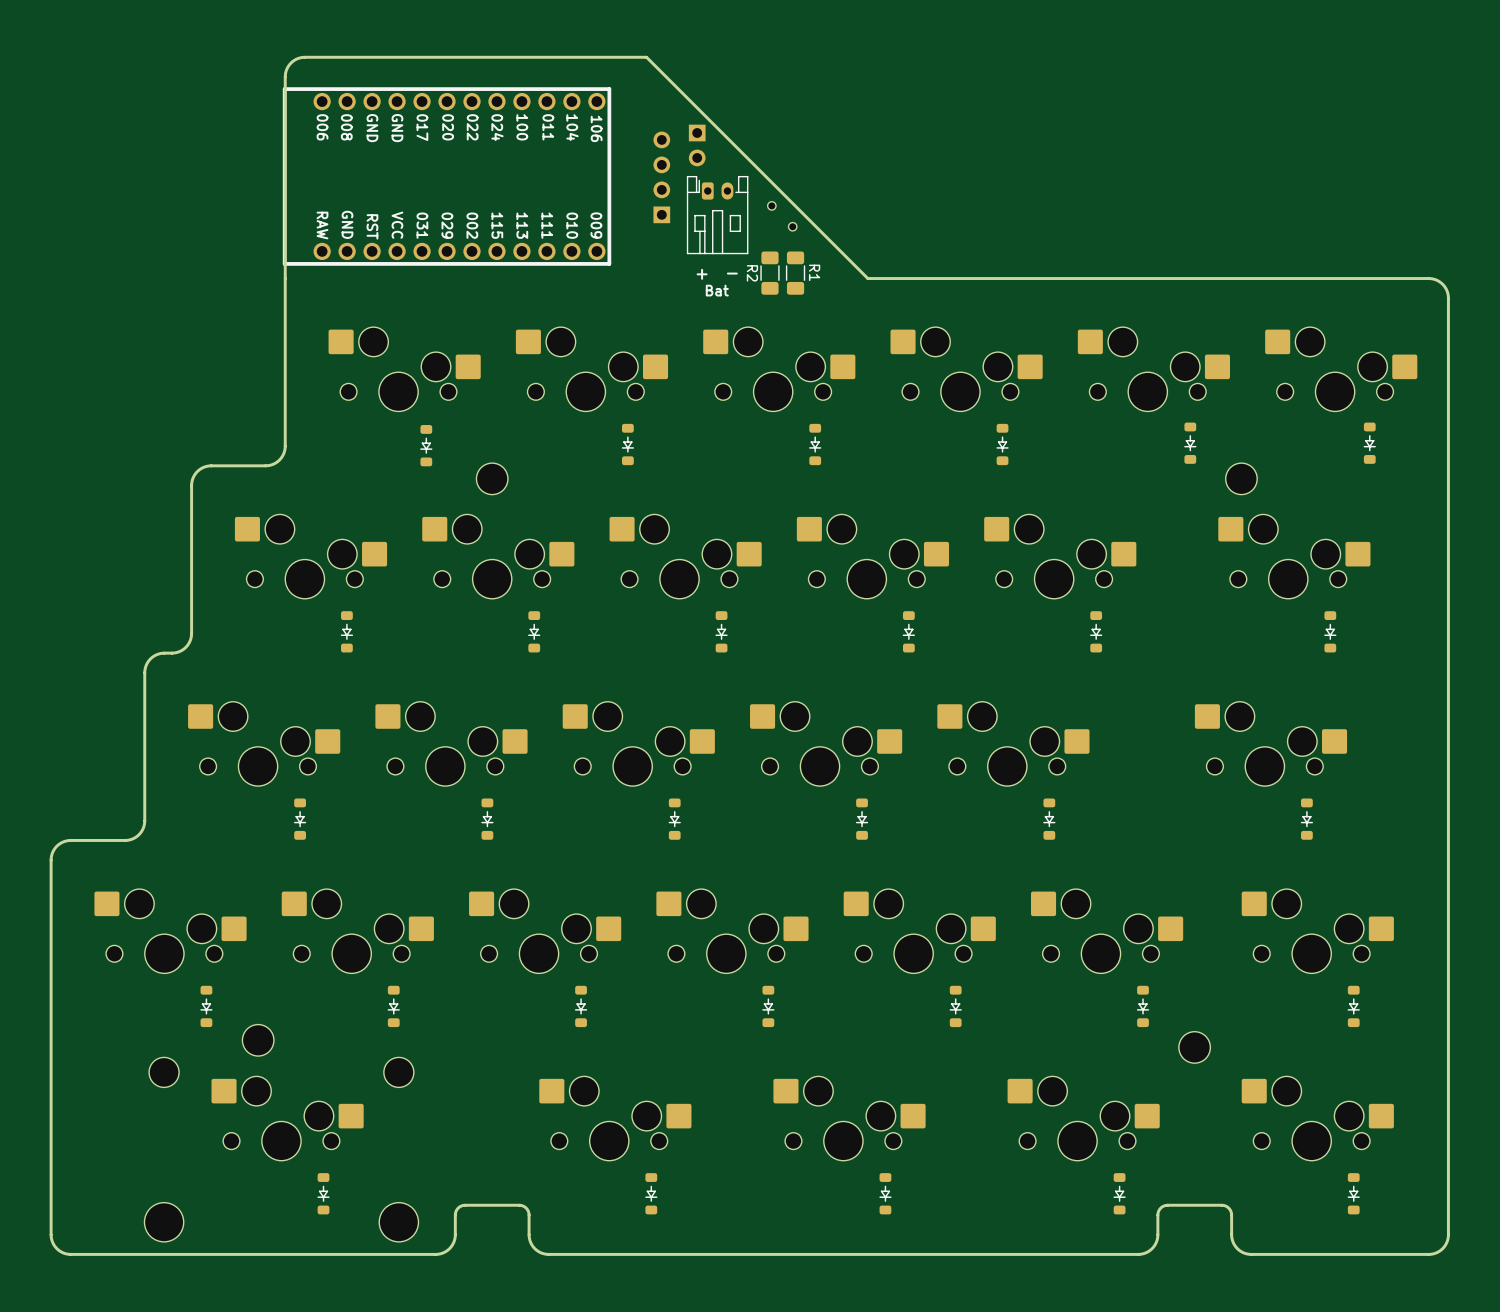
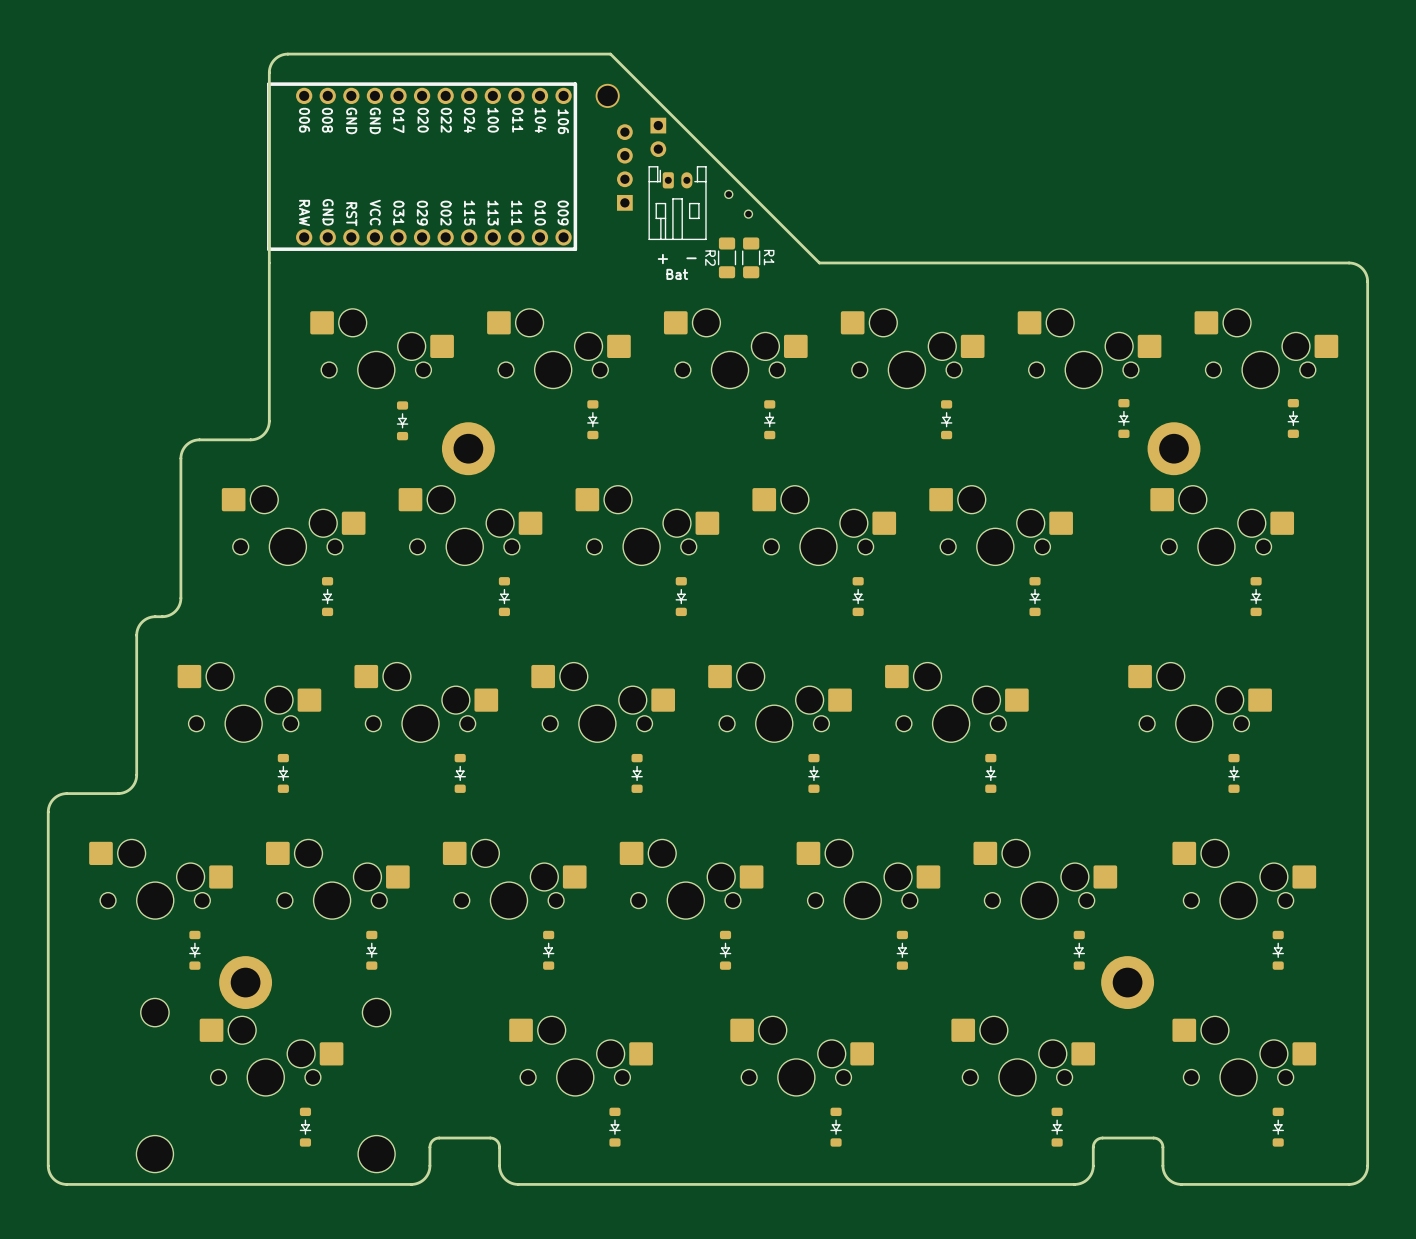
part: none -> (607, 95)
part footprint: [476, 463, 508, 495] -> [441, 422, 495, 476]
part footprint: [1225, 463, 1258, 495] -> [1147, 422, 1201, 476]
part footprint: [242, 1024, 274, 1057] -> [219, 956, 273, 1010]
part footprint: [1178, 1031, 1211, 1064] -> [1101, 956, 1155, 1010]

